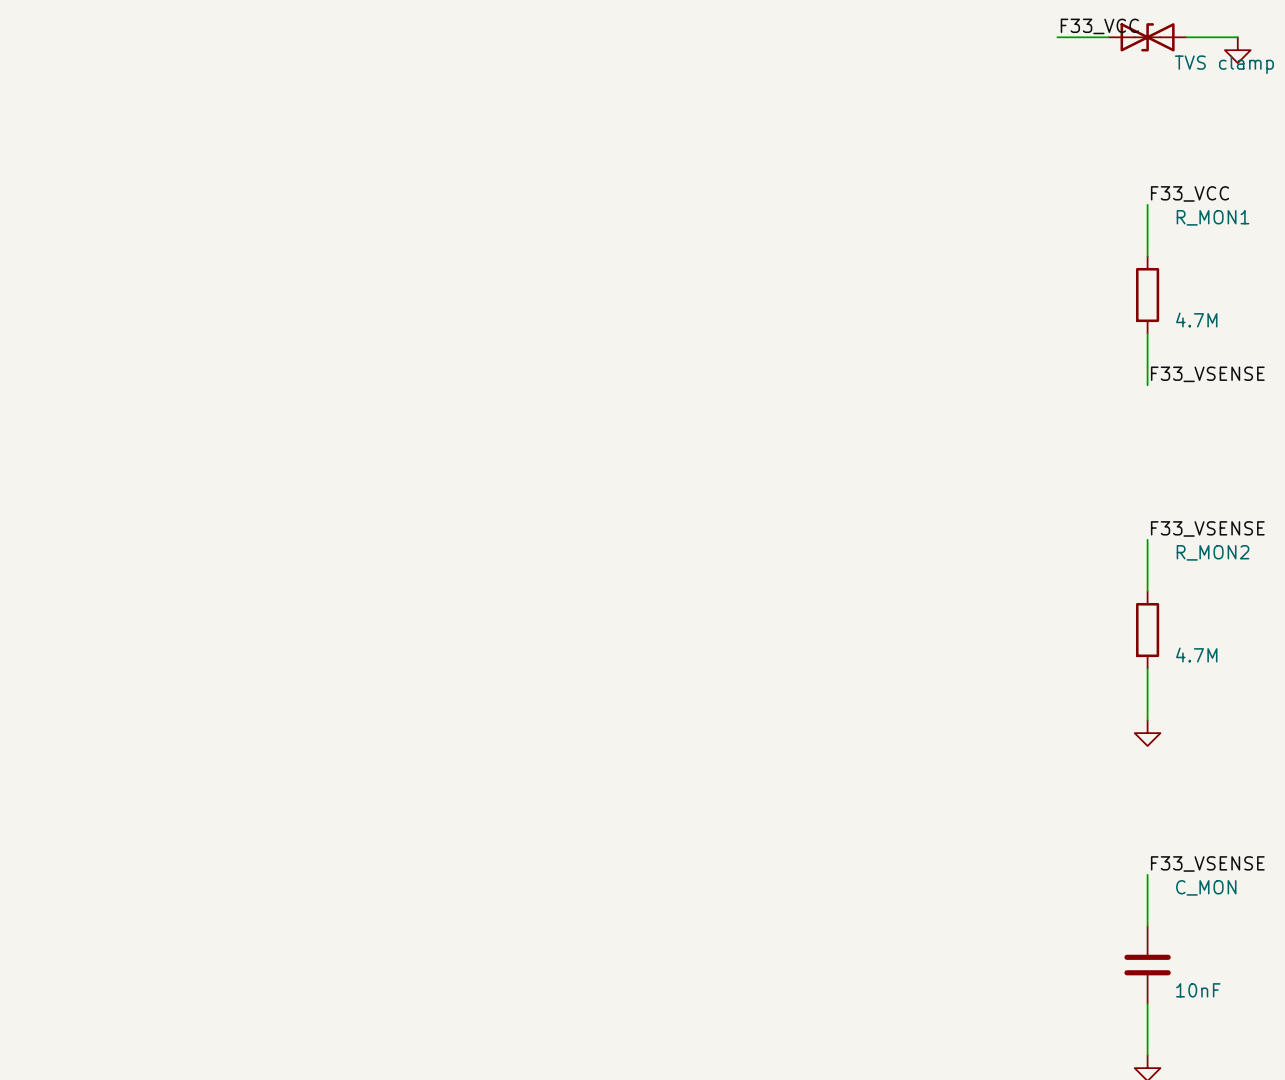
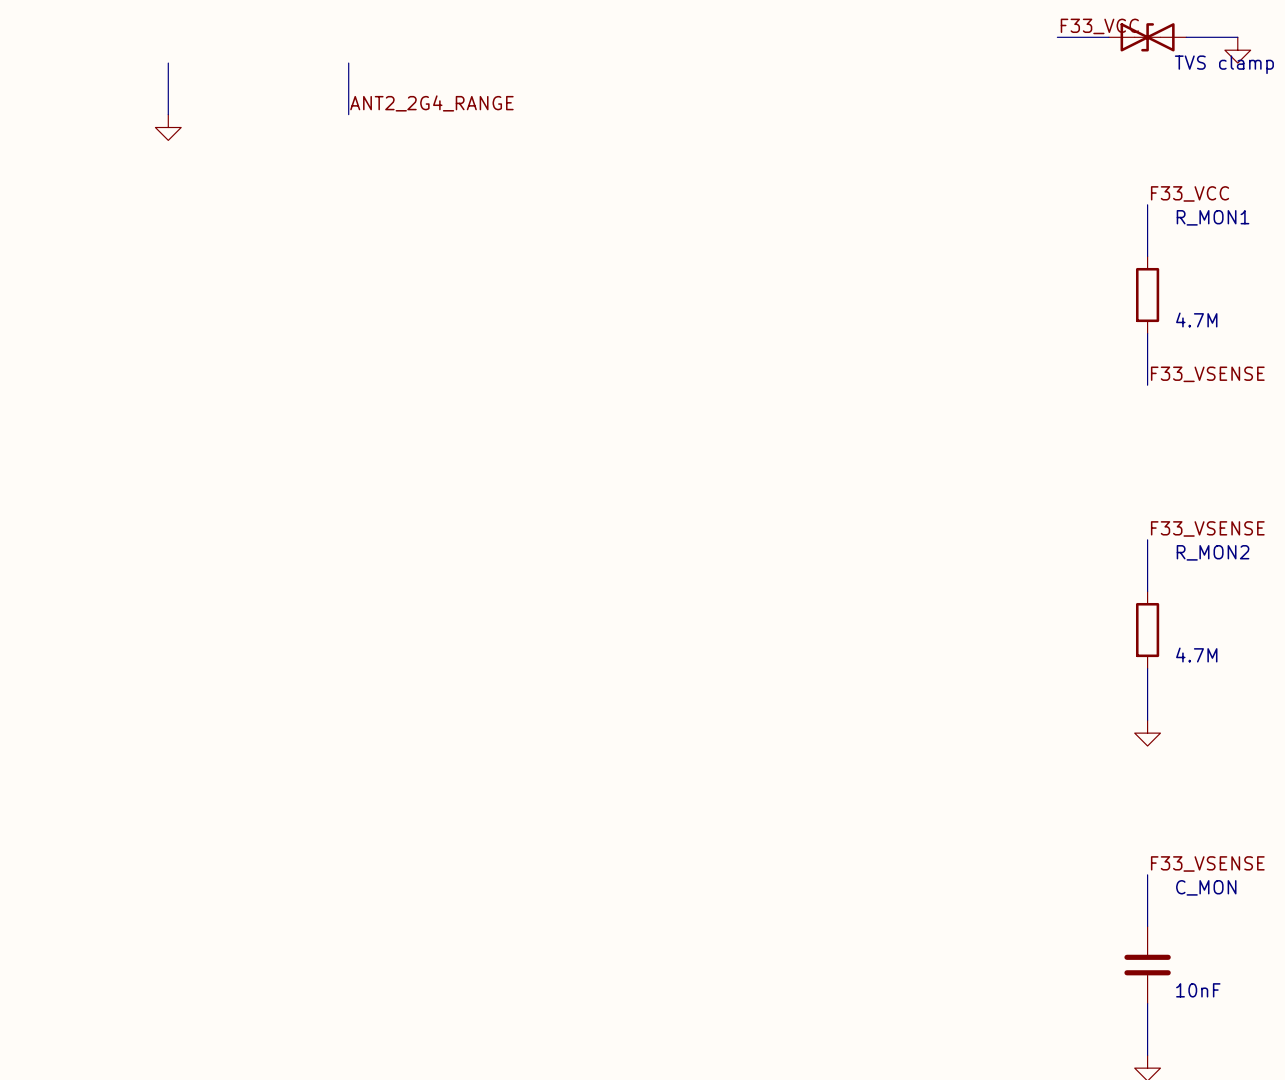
wire: none -> (168, 63) (168, 114)
wire: none -> (348, 63) (348, 114)
label: none -> ANT2_2G4_RANGE (431, 103)
power symbol: none -> (168, 127)

